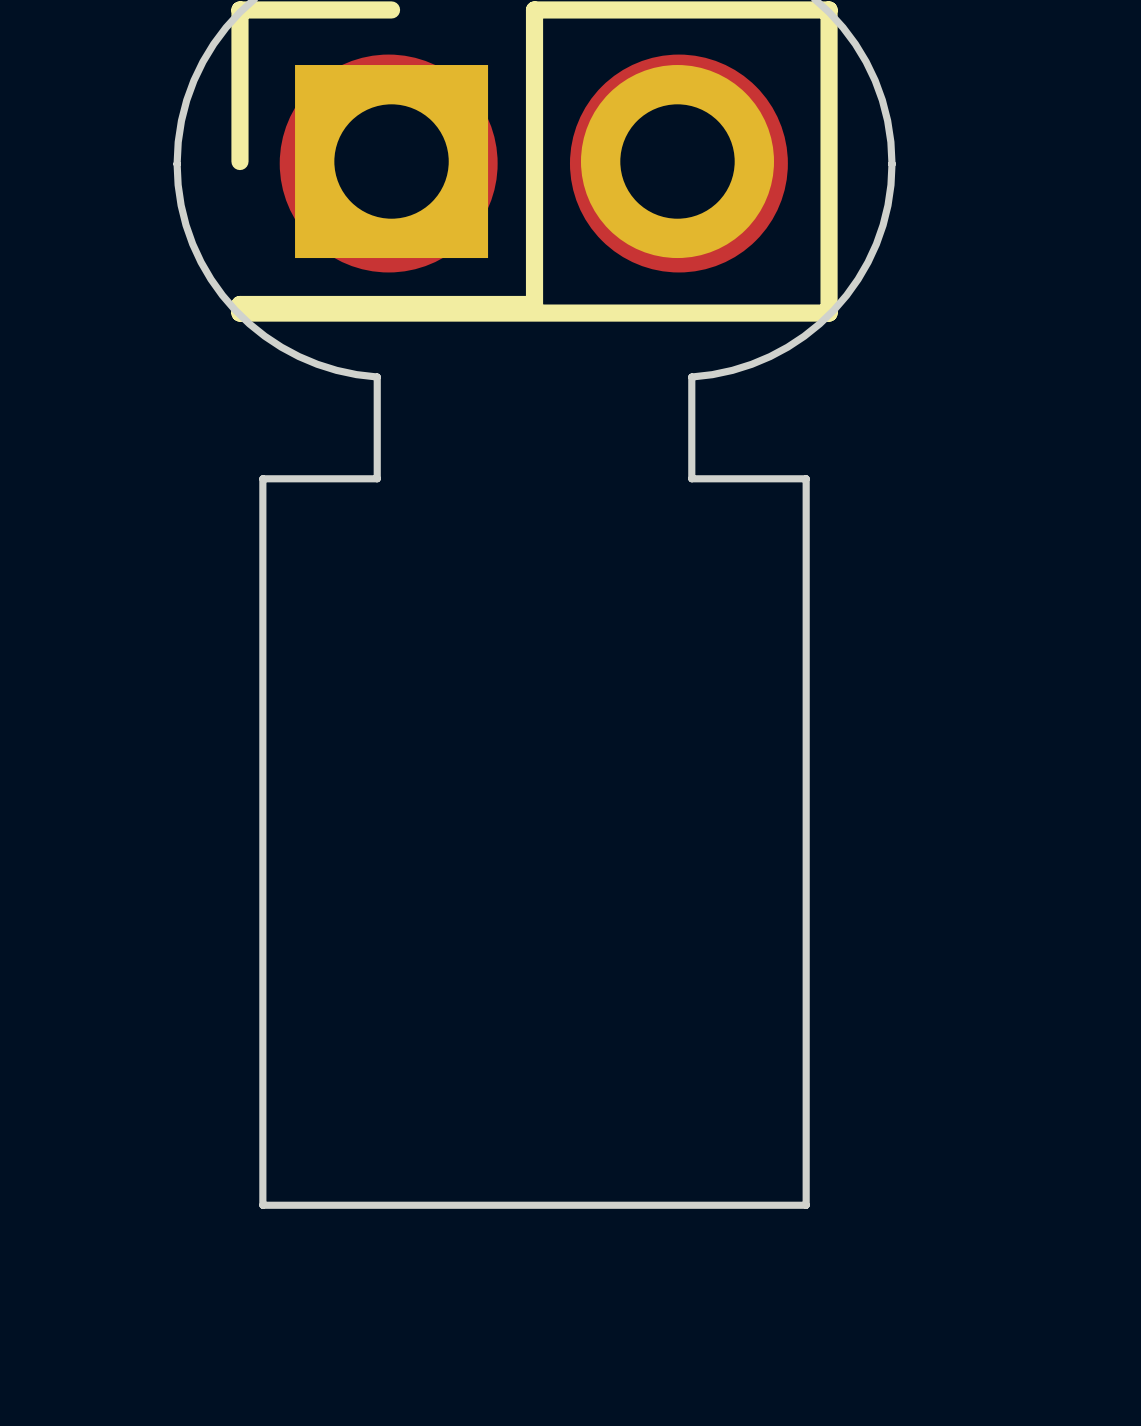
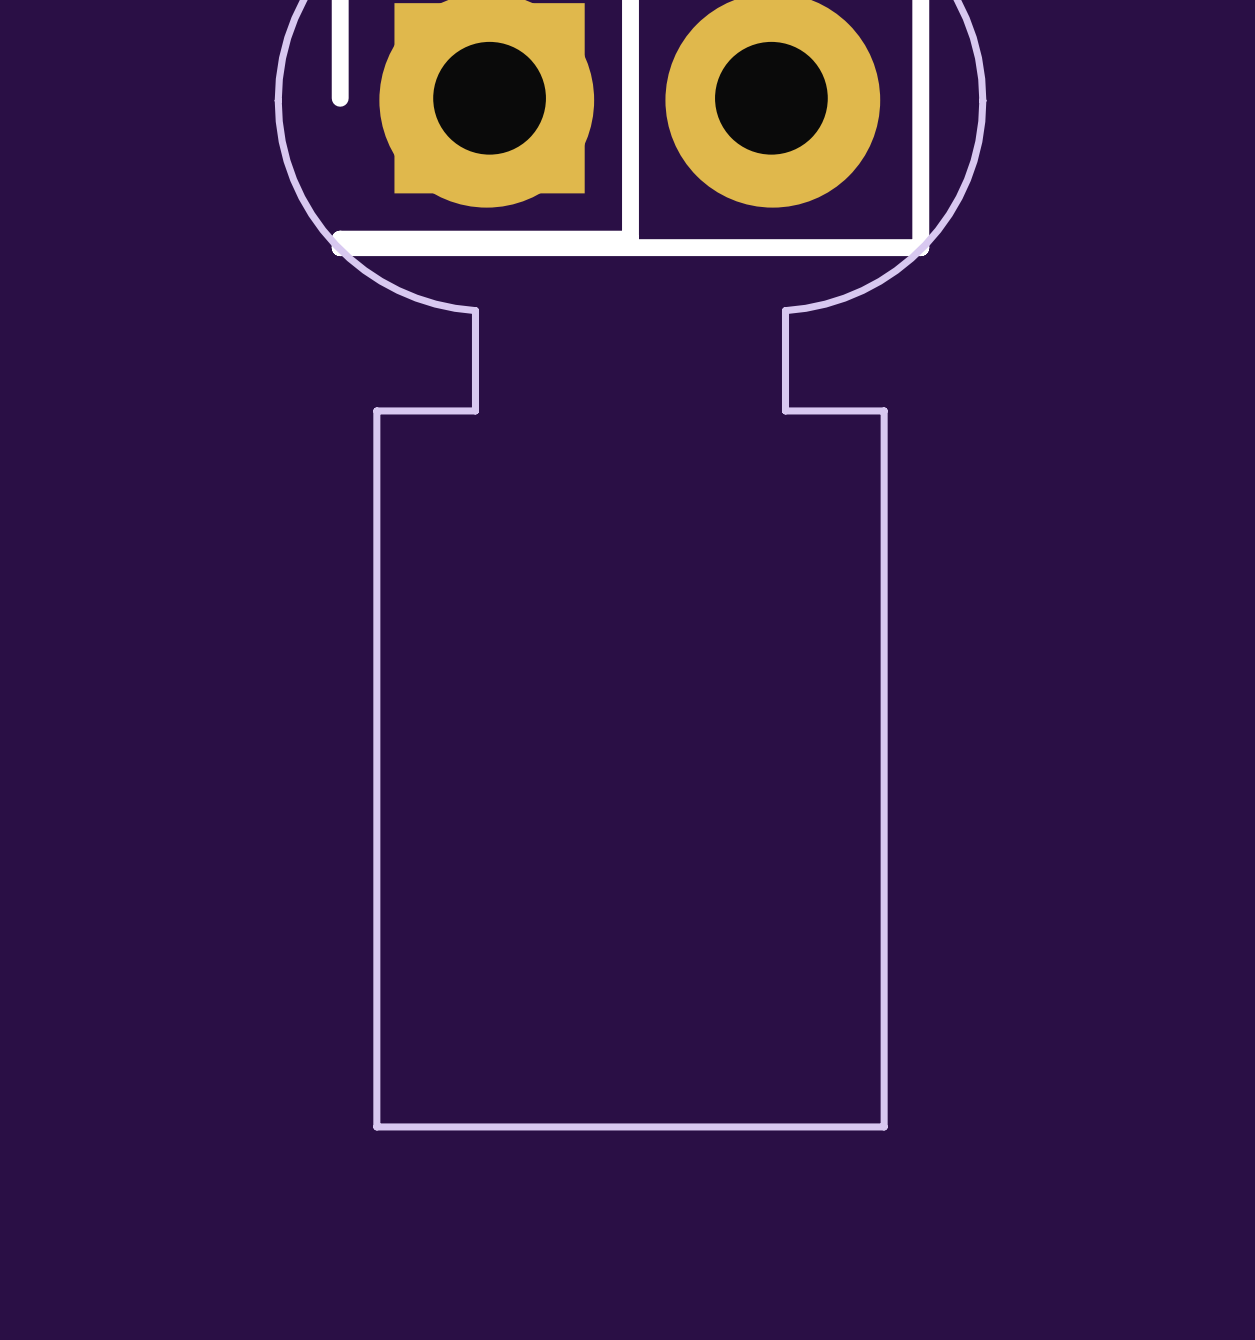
board edge: (377, 478) (262, 478) (262, 1205) (806, 1205) (806, 478) (691, 478) -> (475, 410) (376, 410) (376, 1126) (884, 1126) (884, 410) (785, 410)

